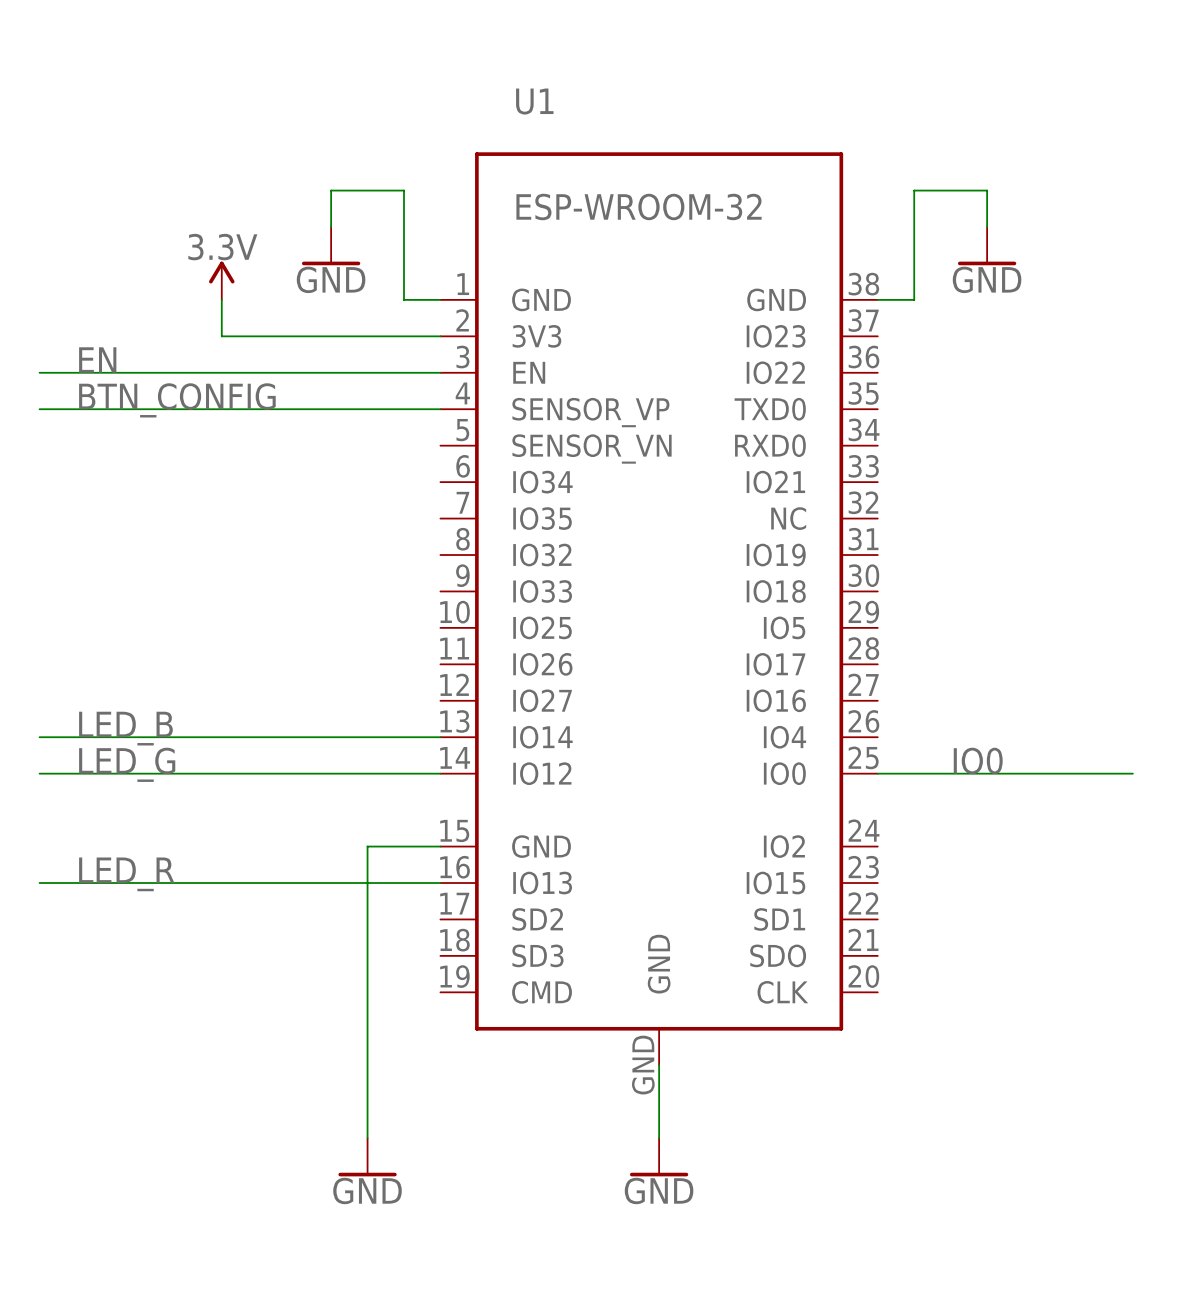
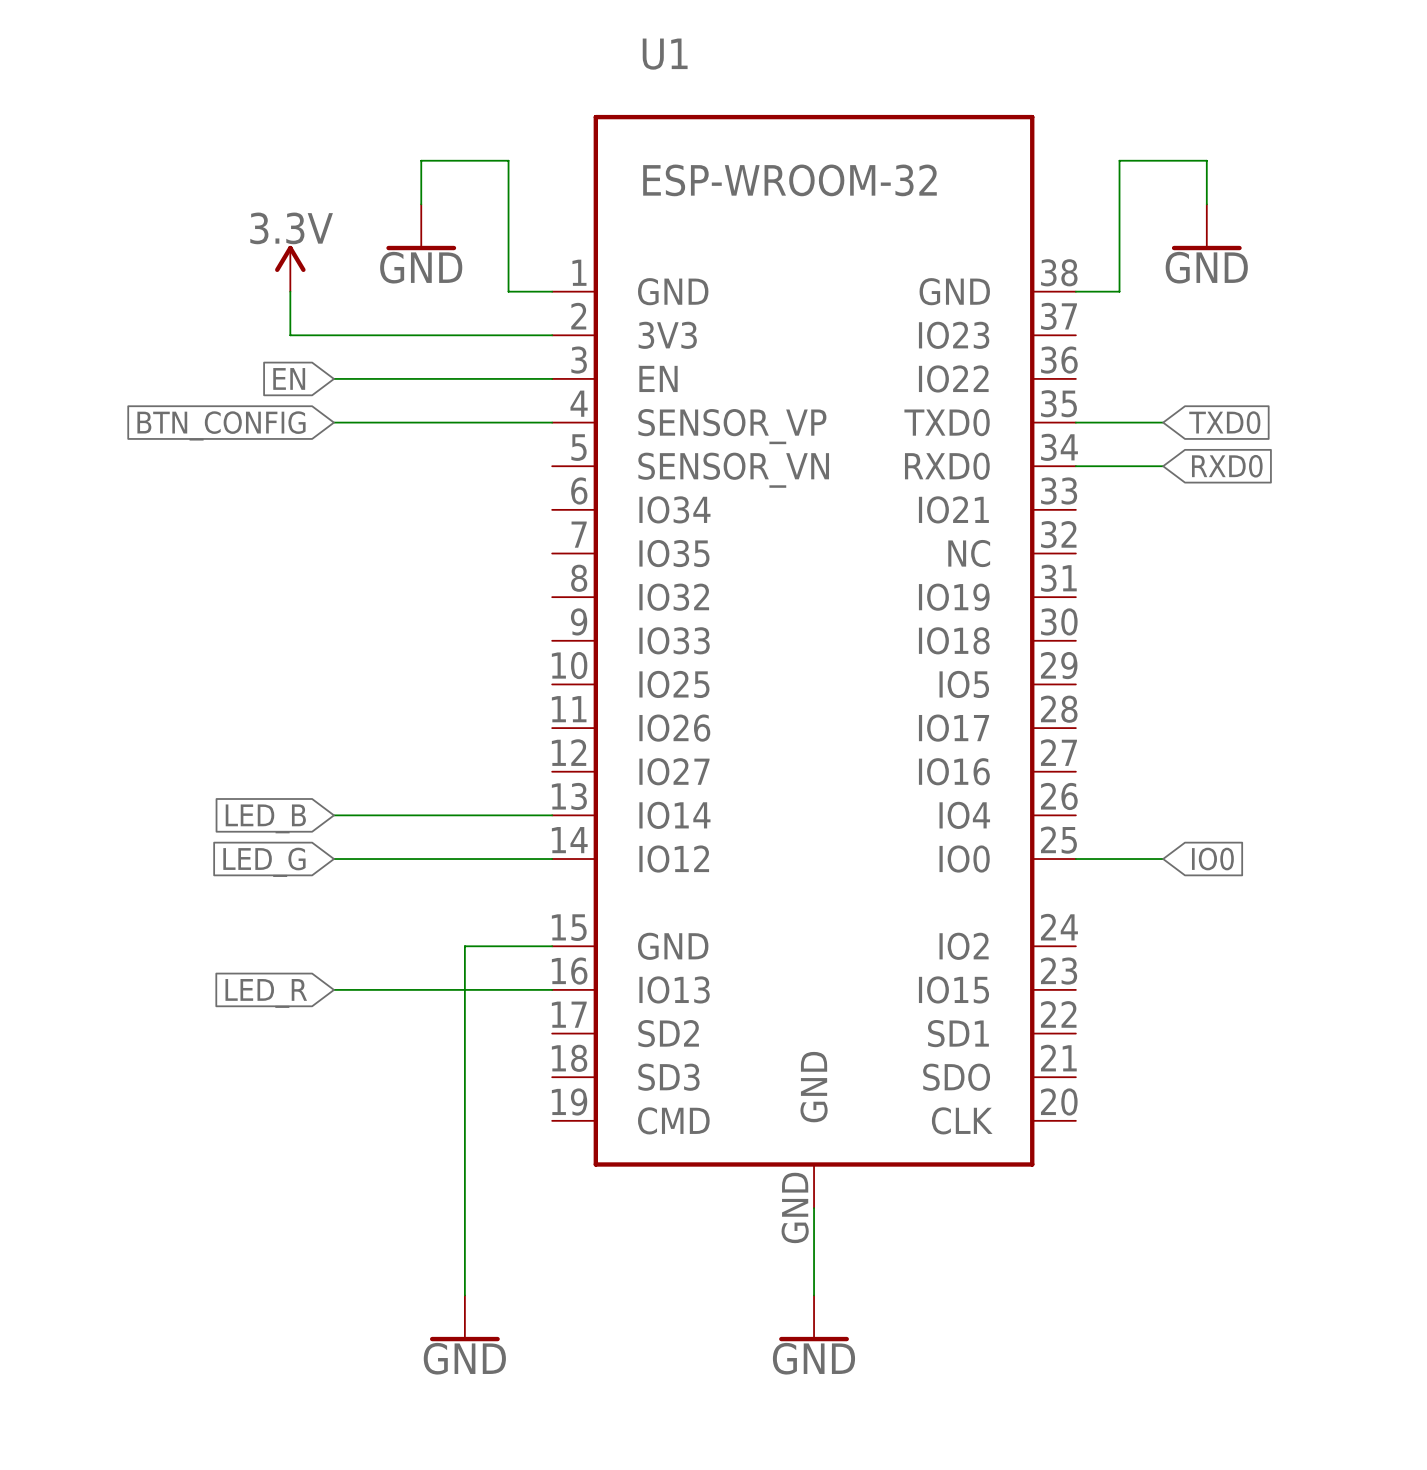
label: EN (97, 360) -> none
wire: (39, 372) (258, 372) -> none
global label: none -> EN (289, 378)
label: BTN_CONFIG (177, 400) -> none
wire: (39, 409) (258, 409) -> none
wire: none -> (1075, 422) (1163, 422)
global label: none -> TXD0 (1224, 422)
global label: none -> BTN_CONFIG (221, 425)
wire: none -> (1075, 466) (1163, 466)
global label: none -> RXD0 (1227, 466)
label: LED_B (125, 728) -> none
wire: (39, 737) (258, 737) -> none
global label: none -> LED_B (265, 818)
label: IO0 (978, 760) -> none
label: LED_G (127, 764) -> none
wire: (39, 773) (258, 773) -> none
wire: (950, 773) (1132, 773) -> none
global label: none -> IO0 (1212, 859)
global label: none -> LED_G (264, 862)
label: LED_R (126, 874) -> none
wire: (39, 883) (258, 883) -> none
global label: none -> LED_R (266, 993)

